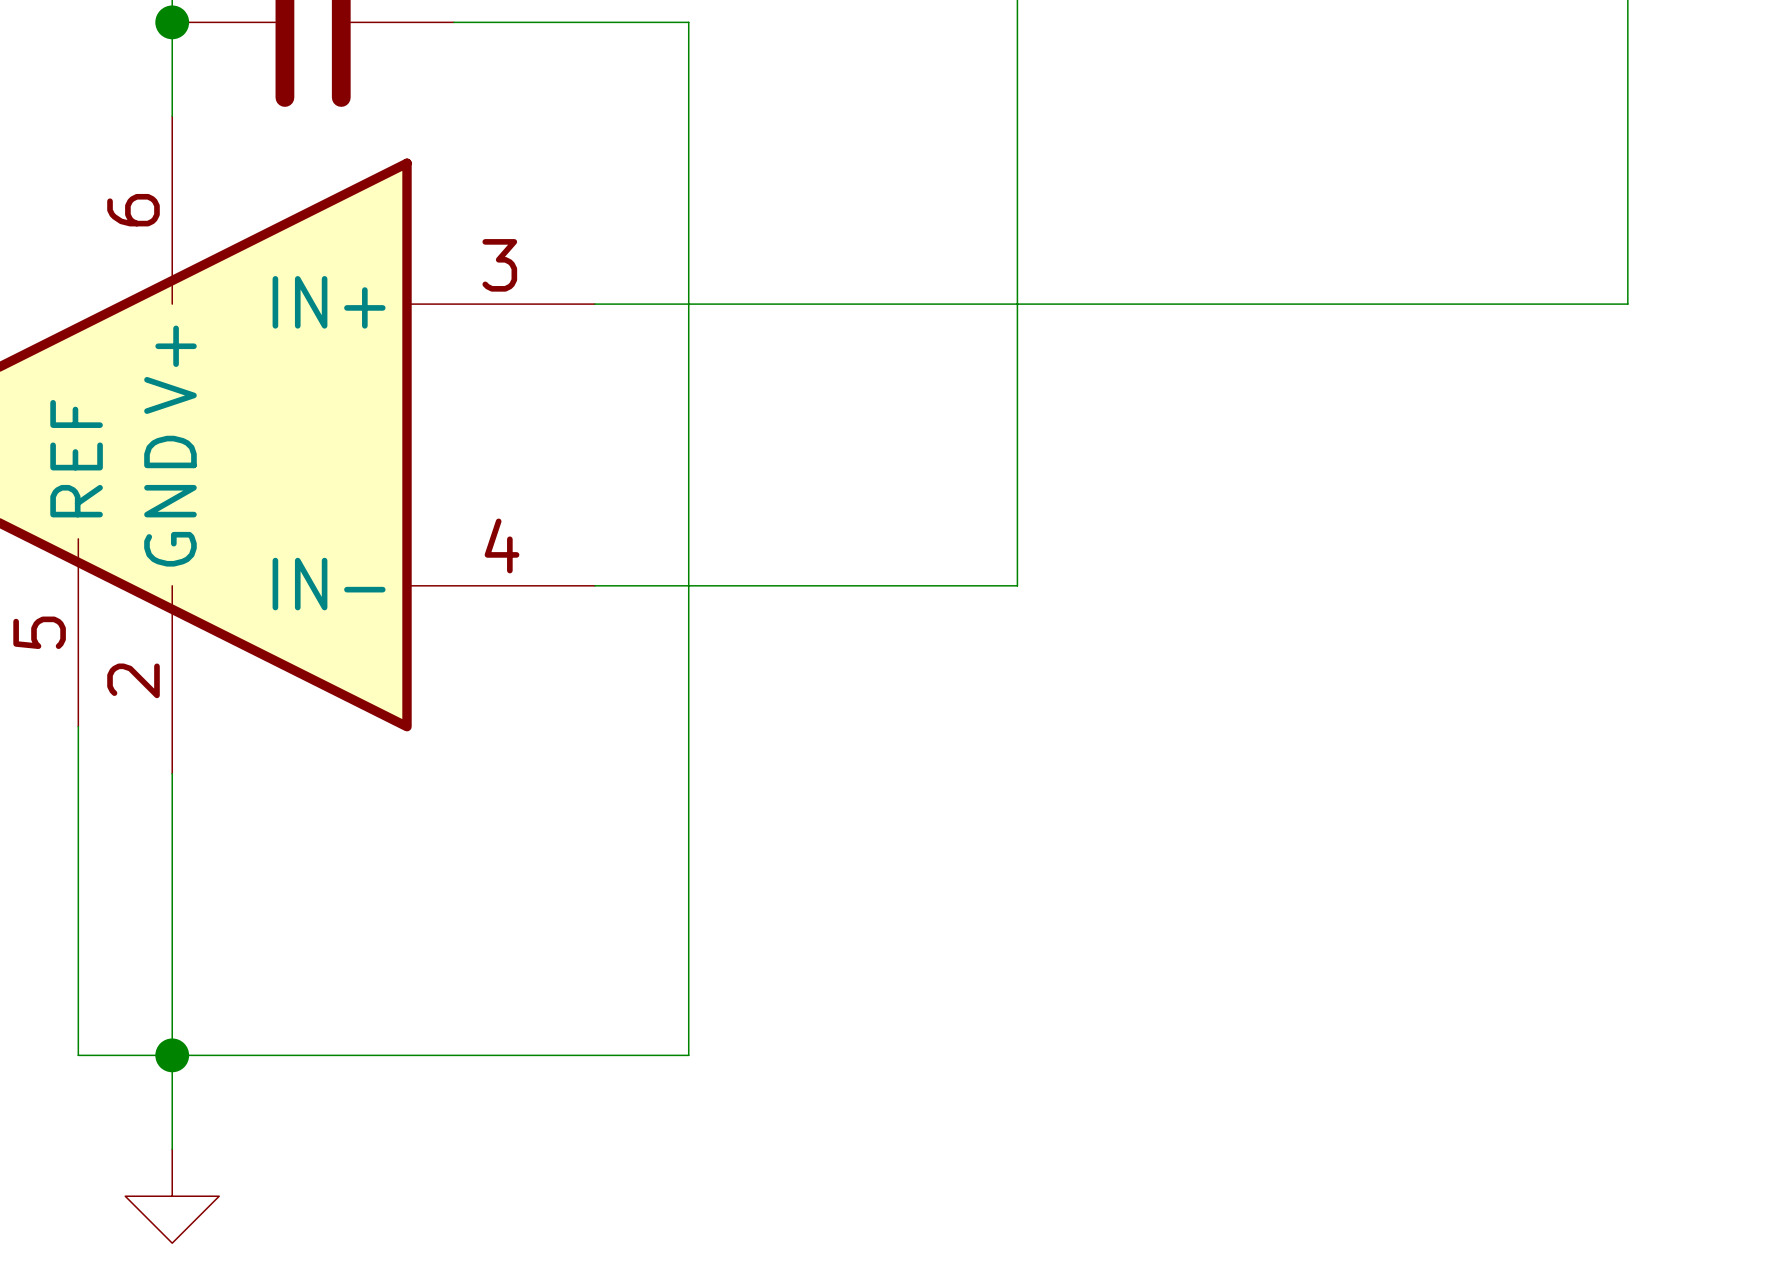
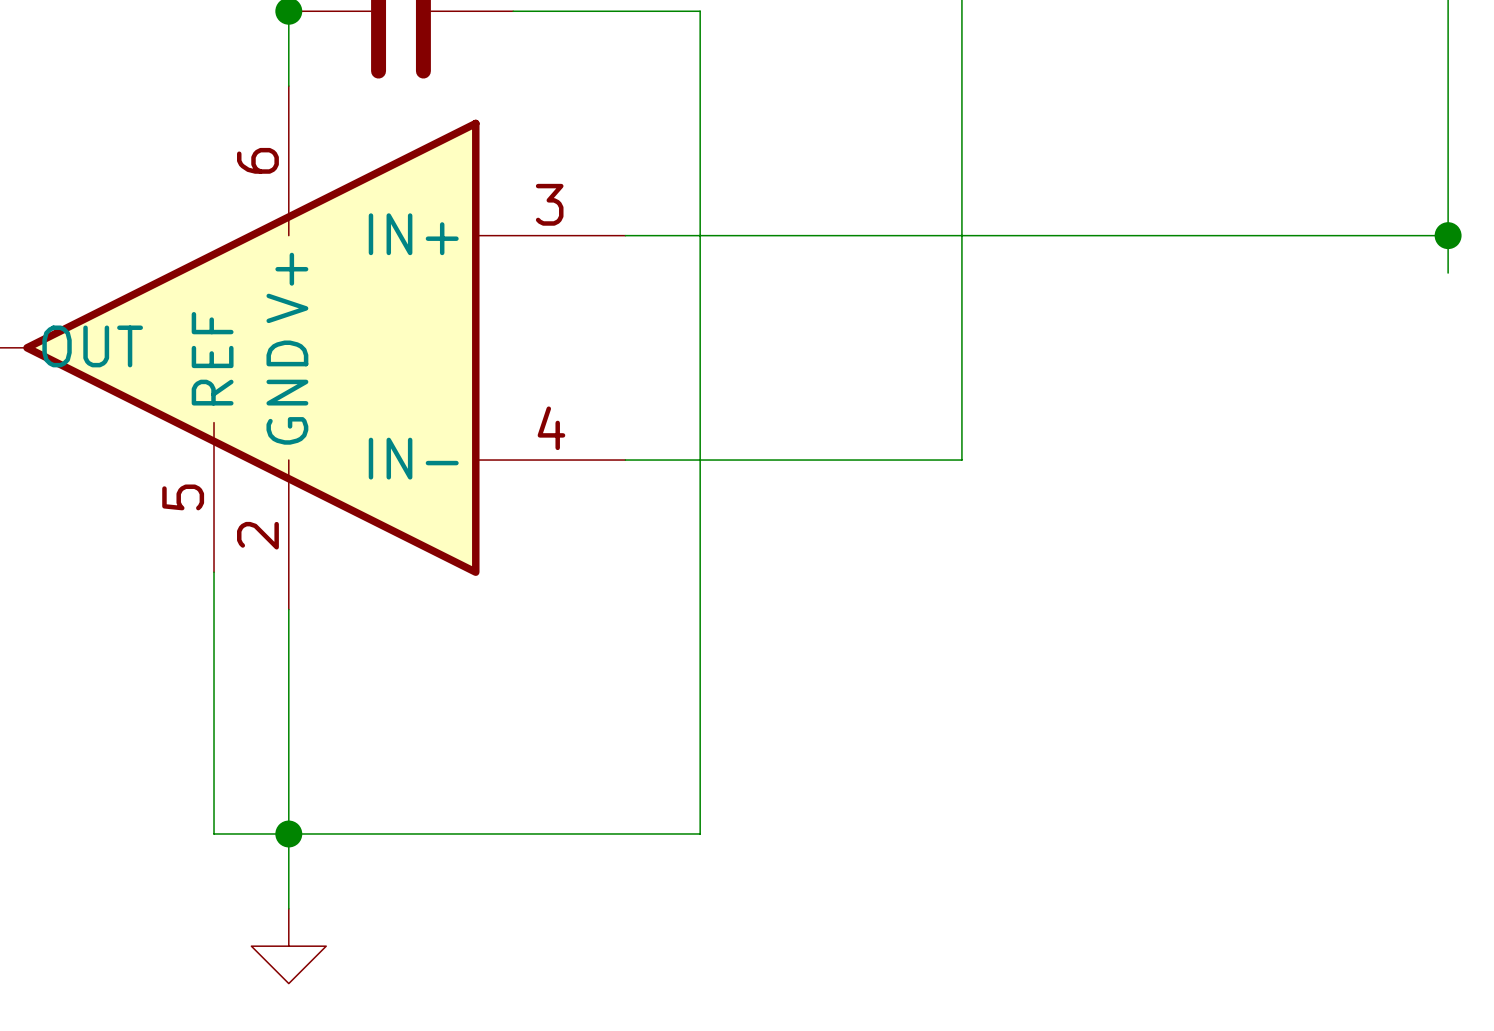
wire: none -> (1448, 235) (1448, 273)
junction: none -> (1448, 235)

